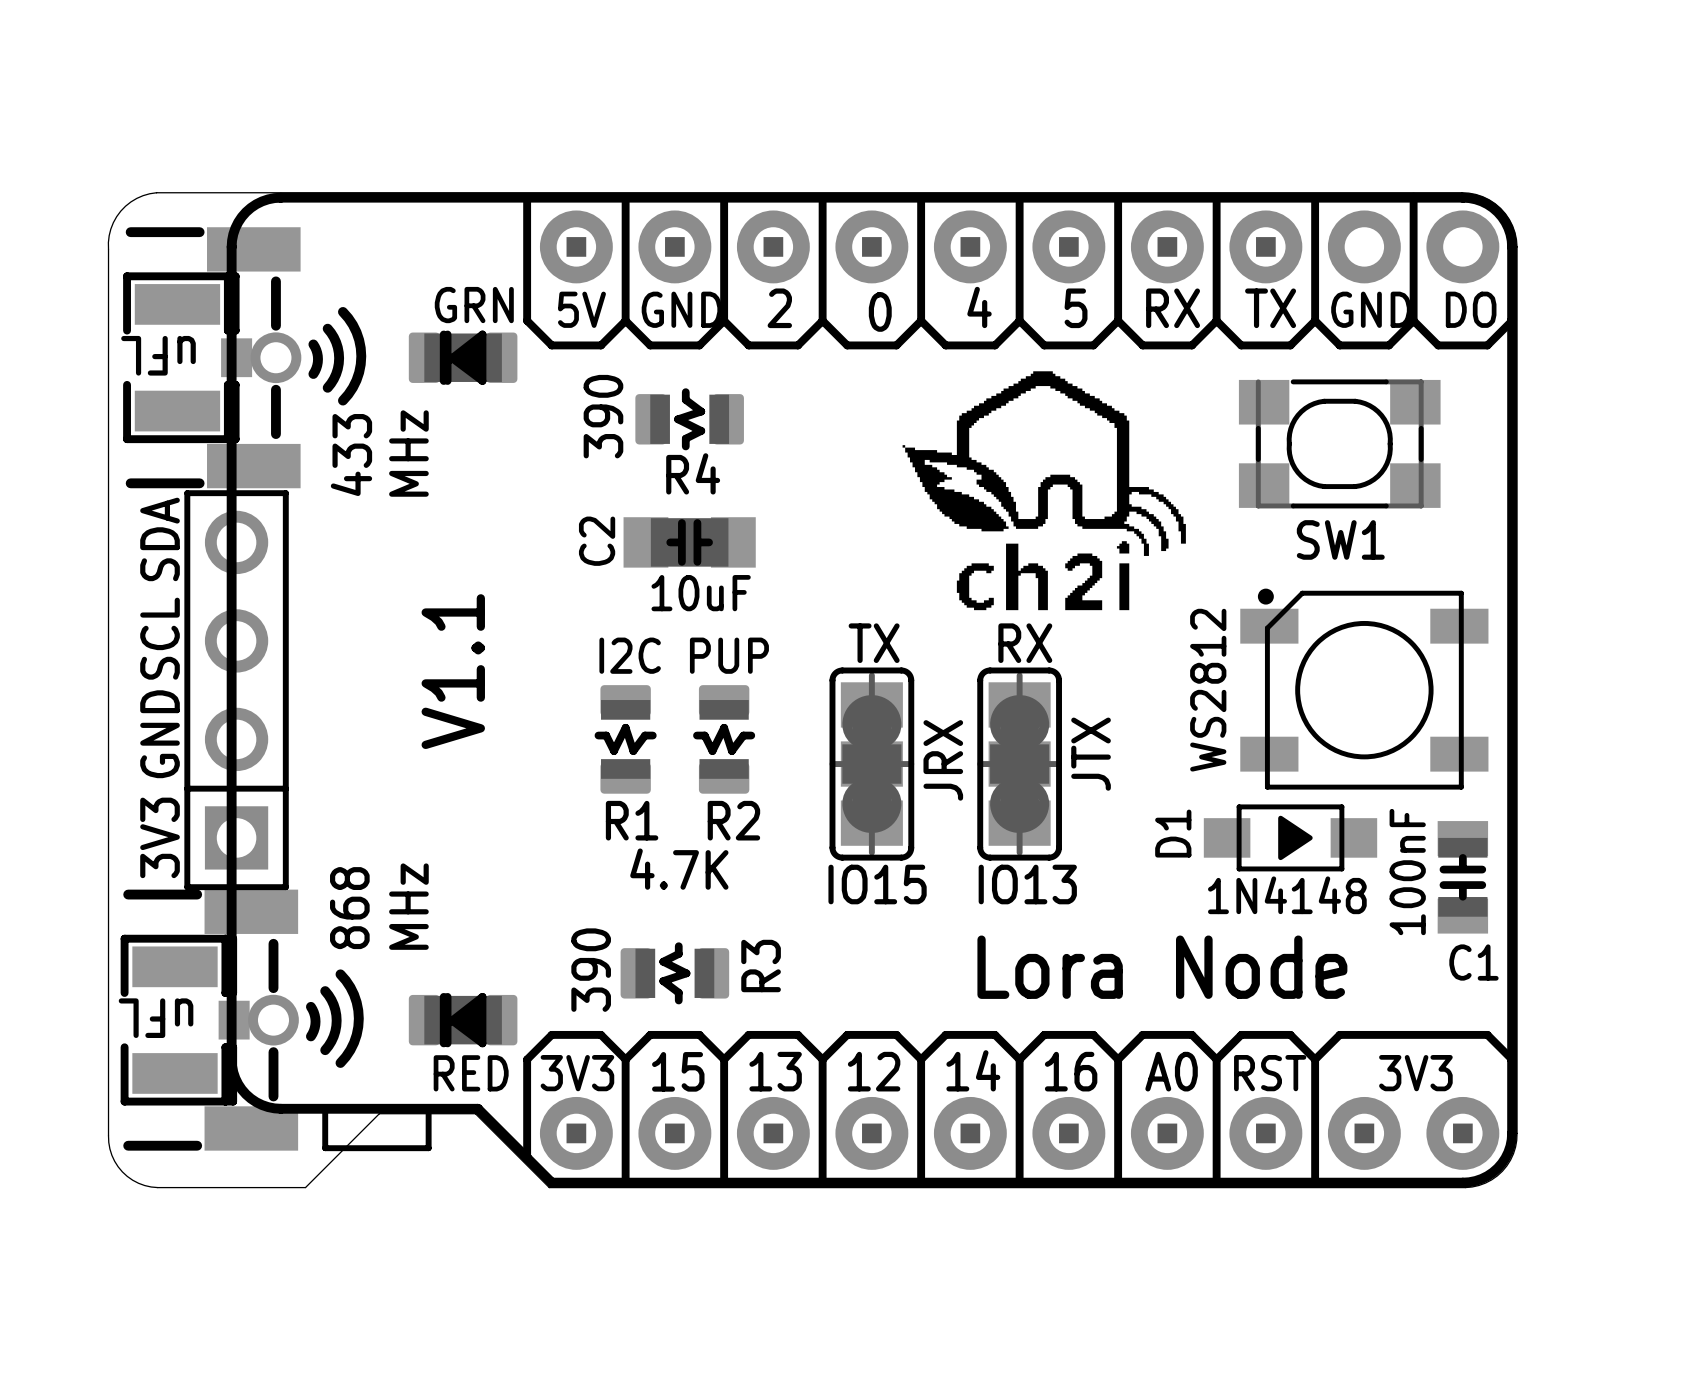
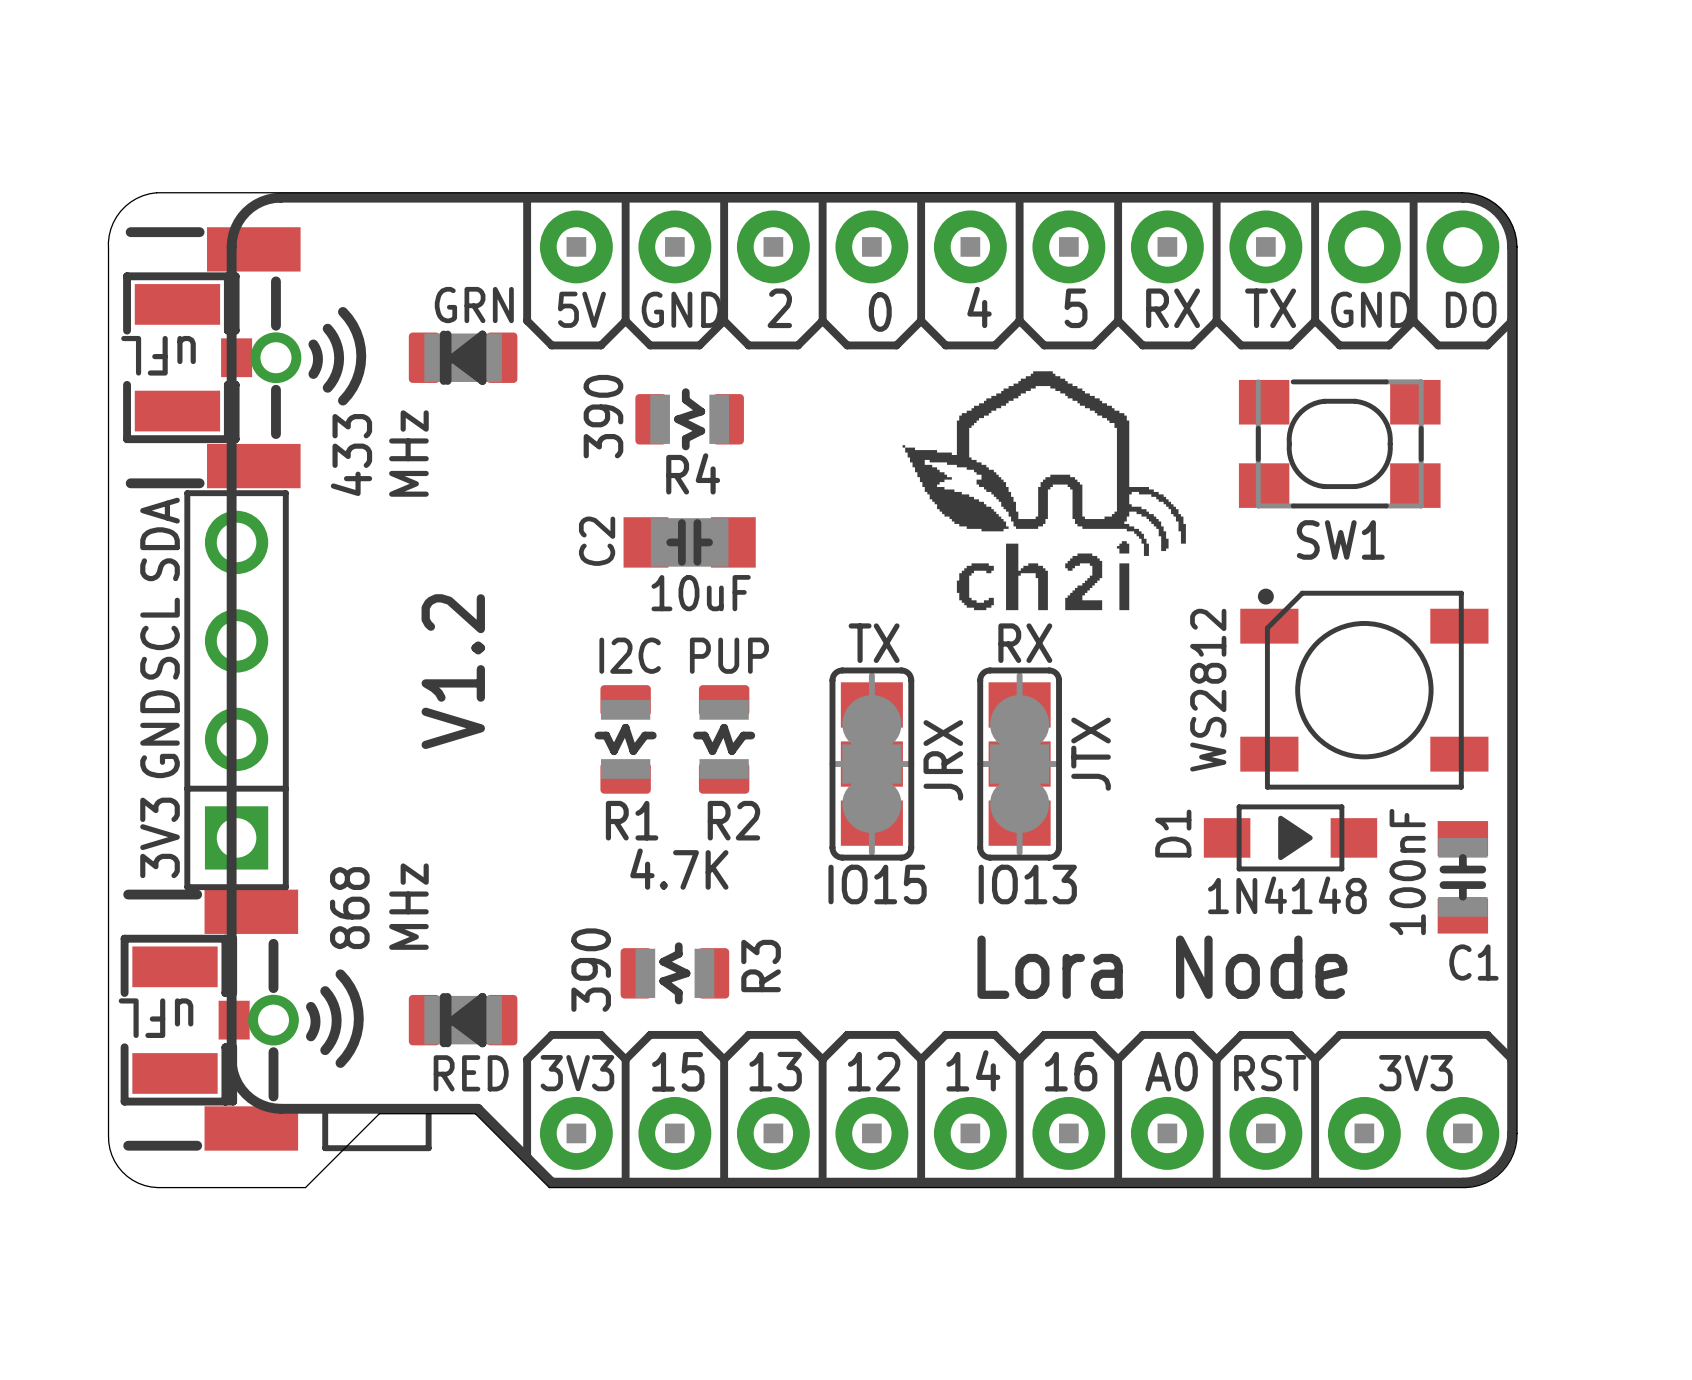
text: V1.1 (453, 671) -> V1.2 (453, 671)

